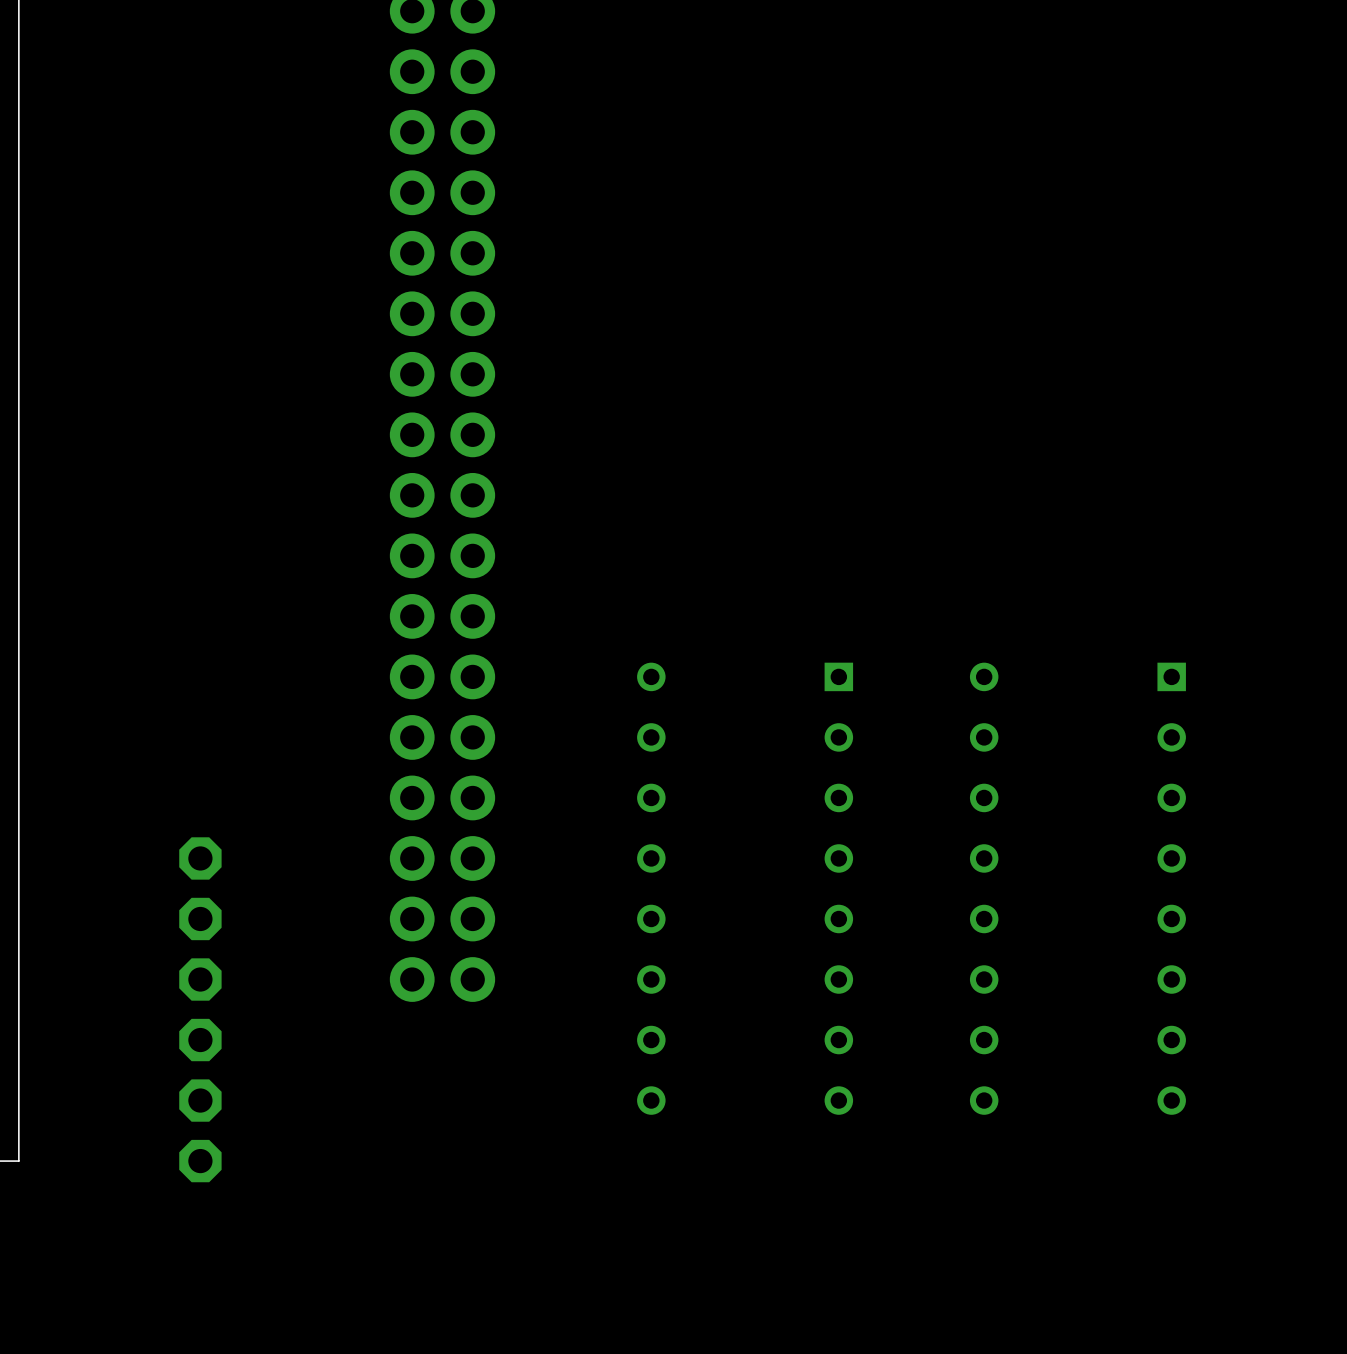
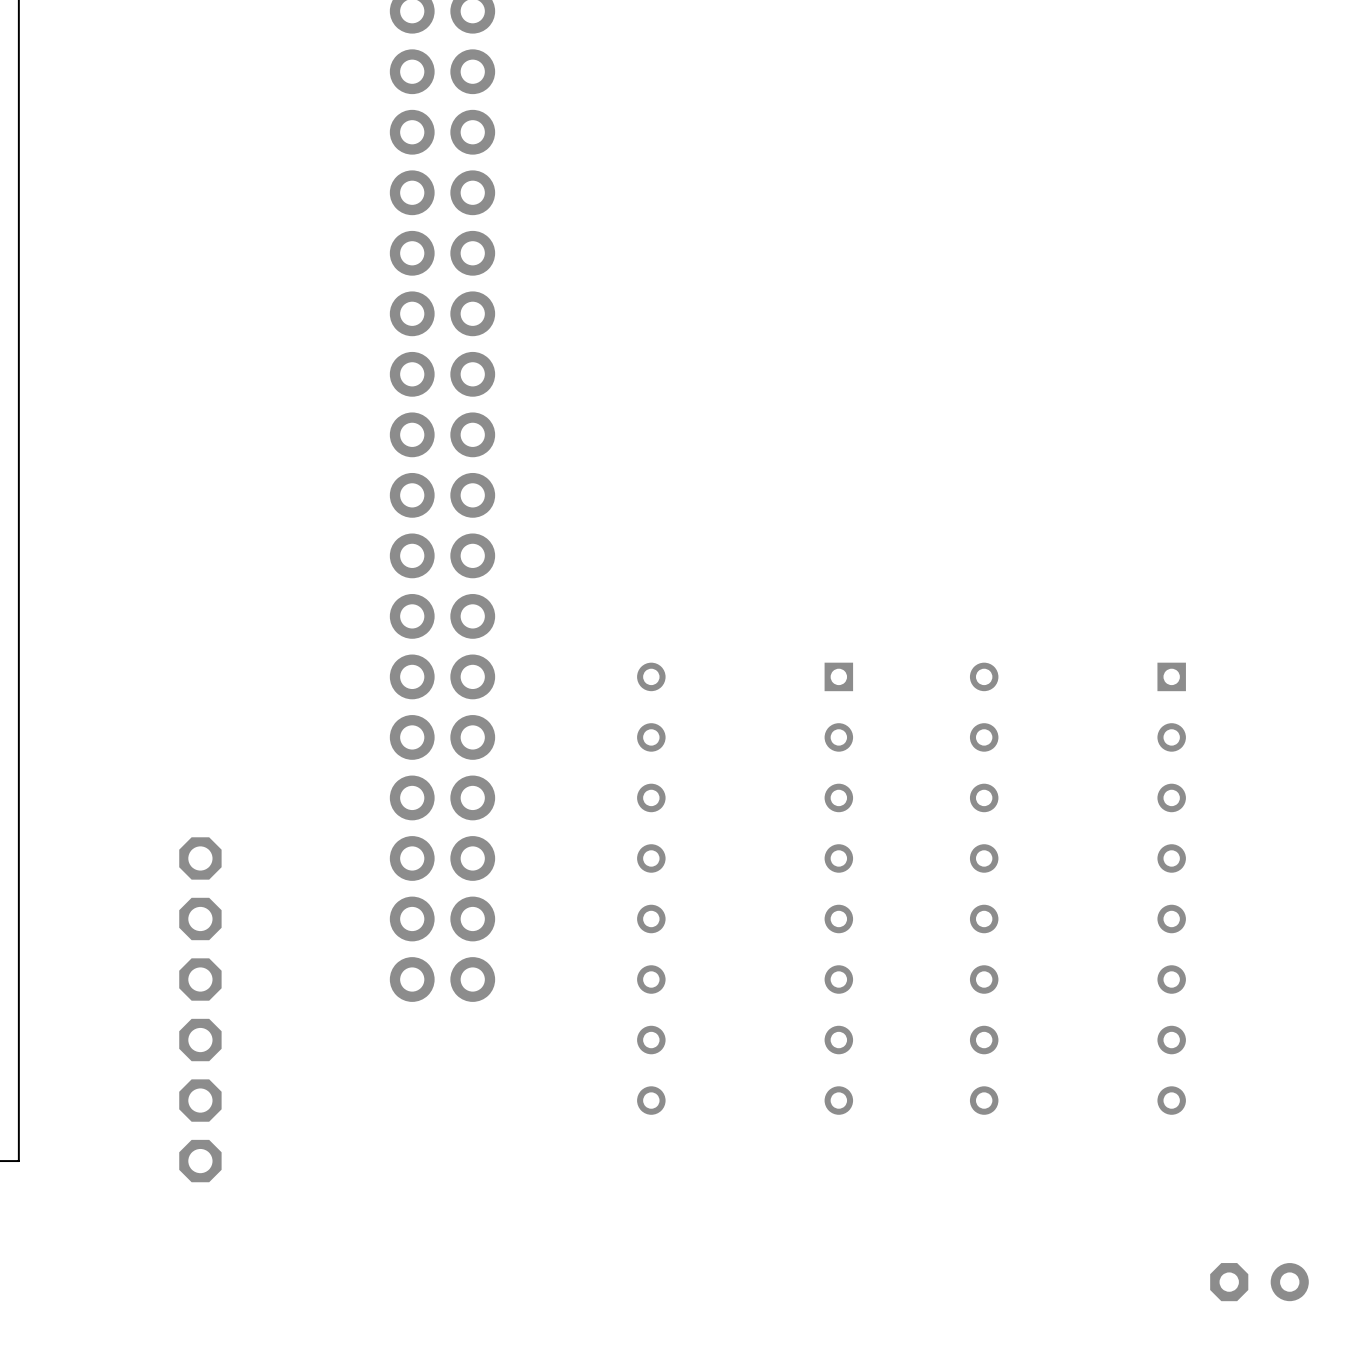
part: none -> (1259, 1282)

